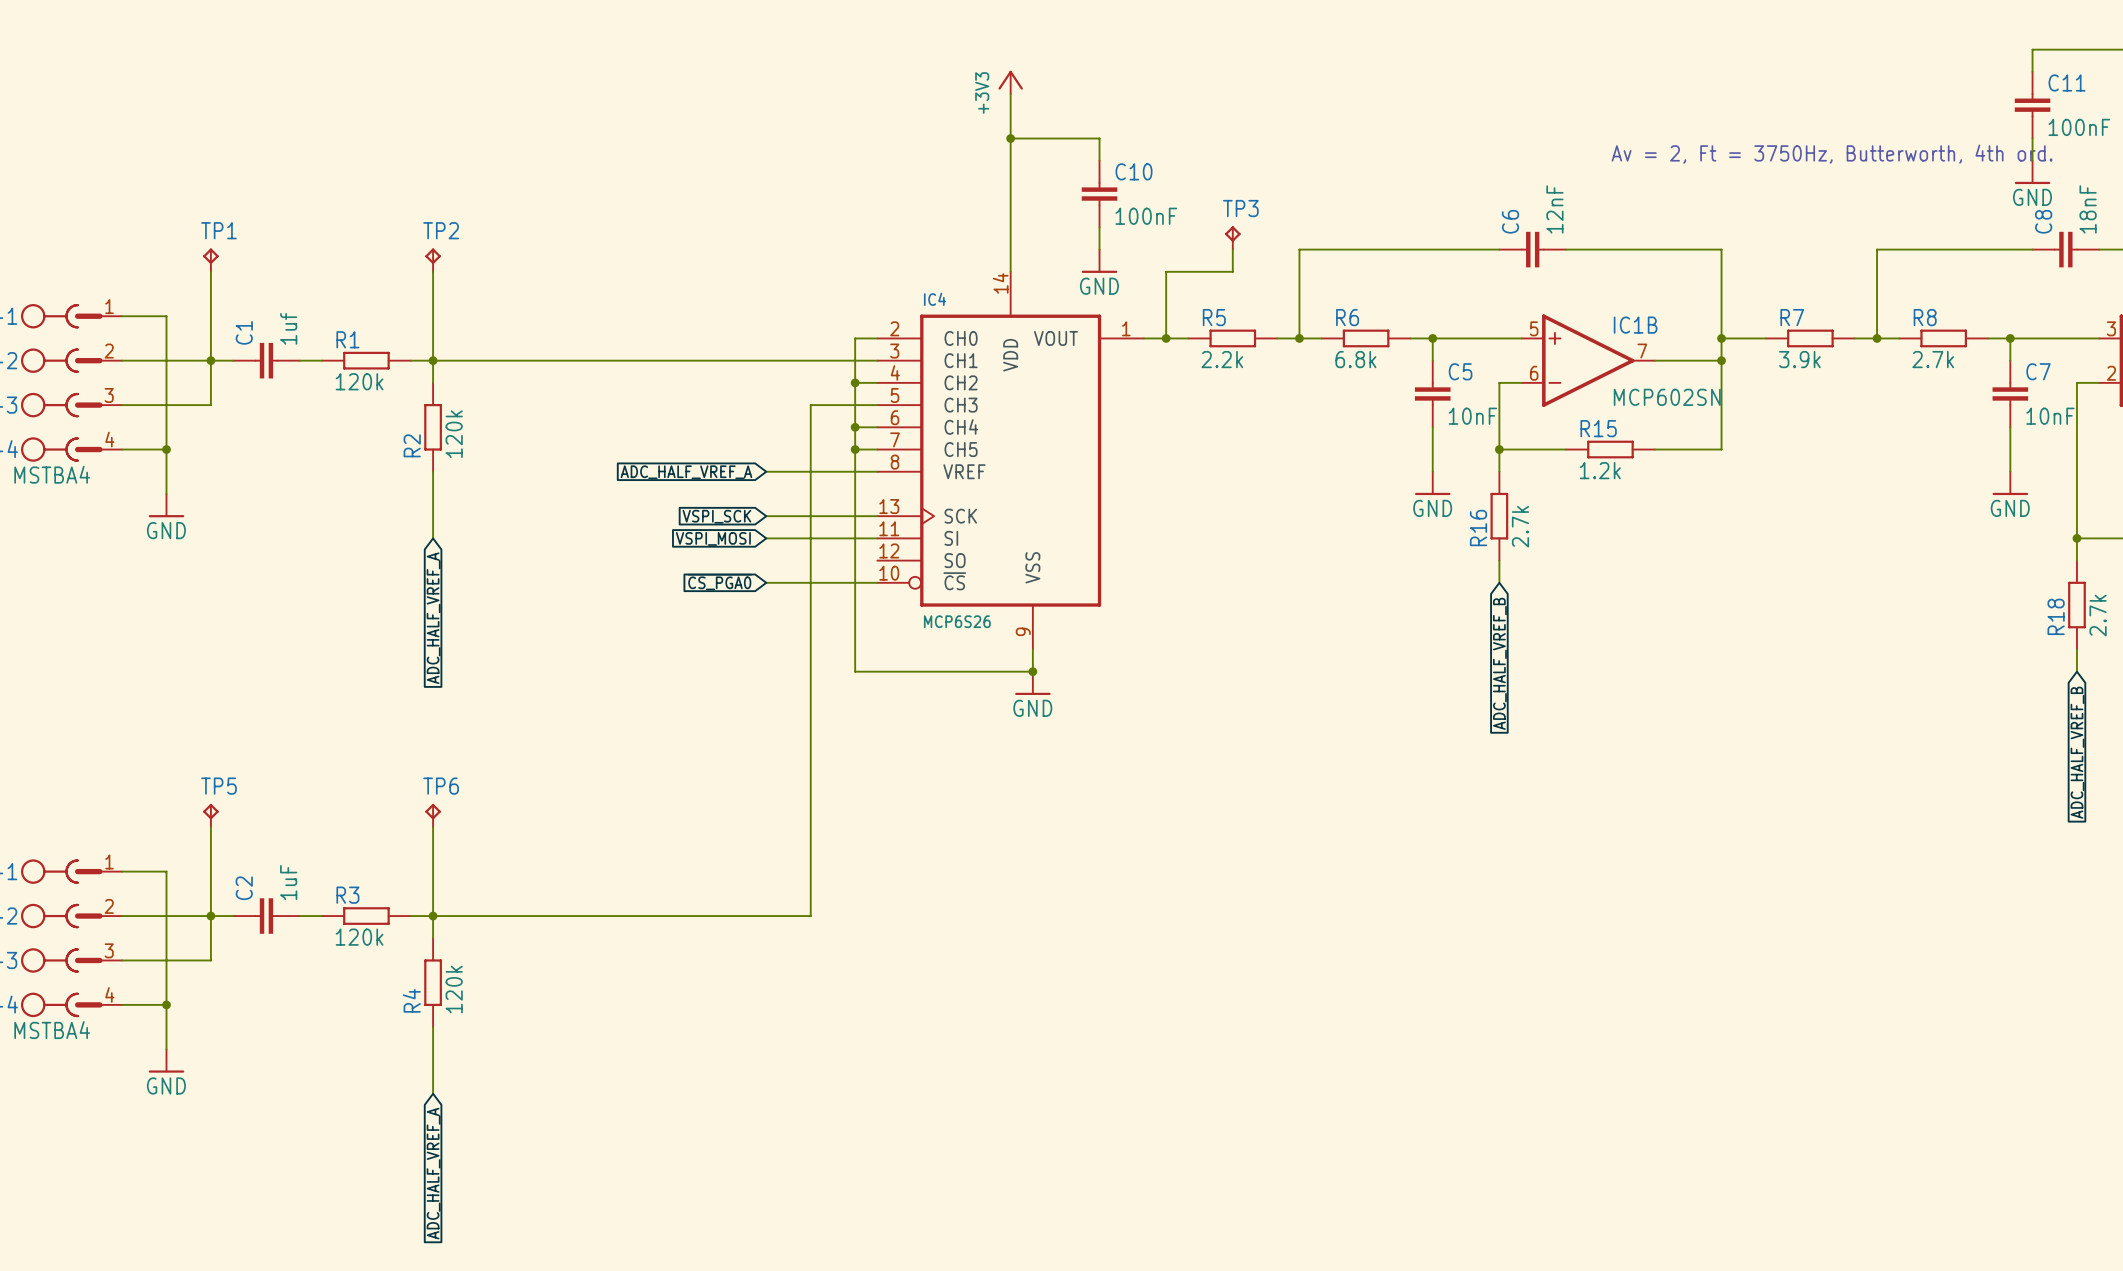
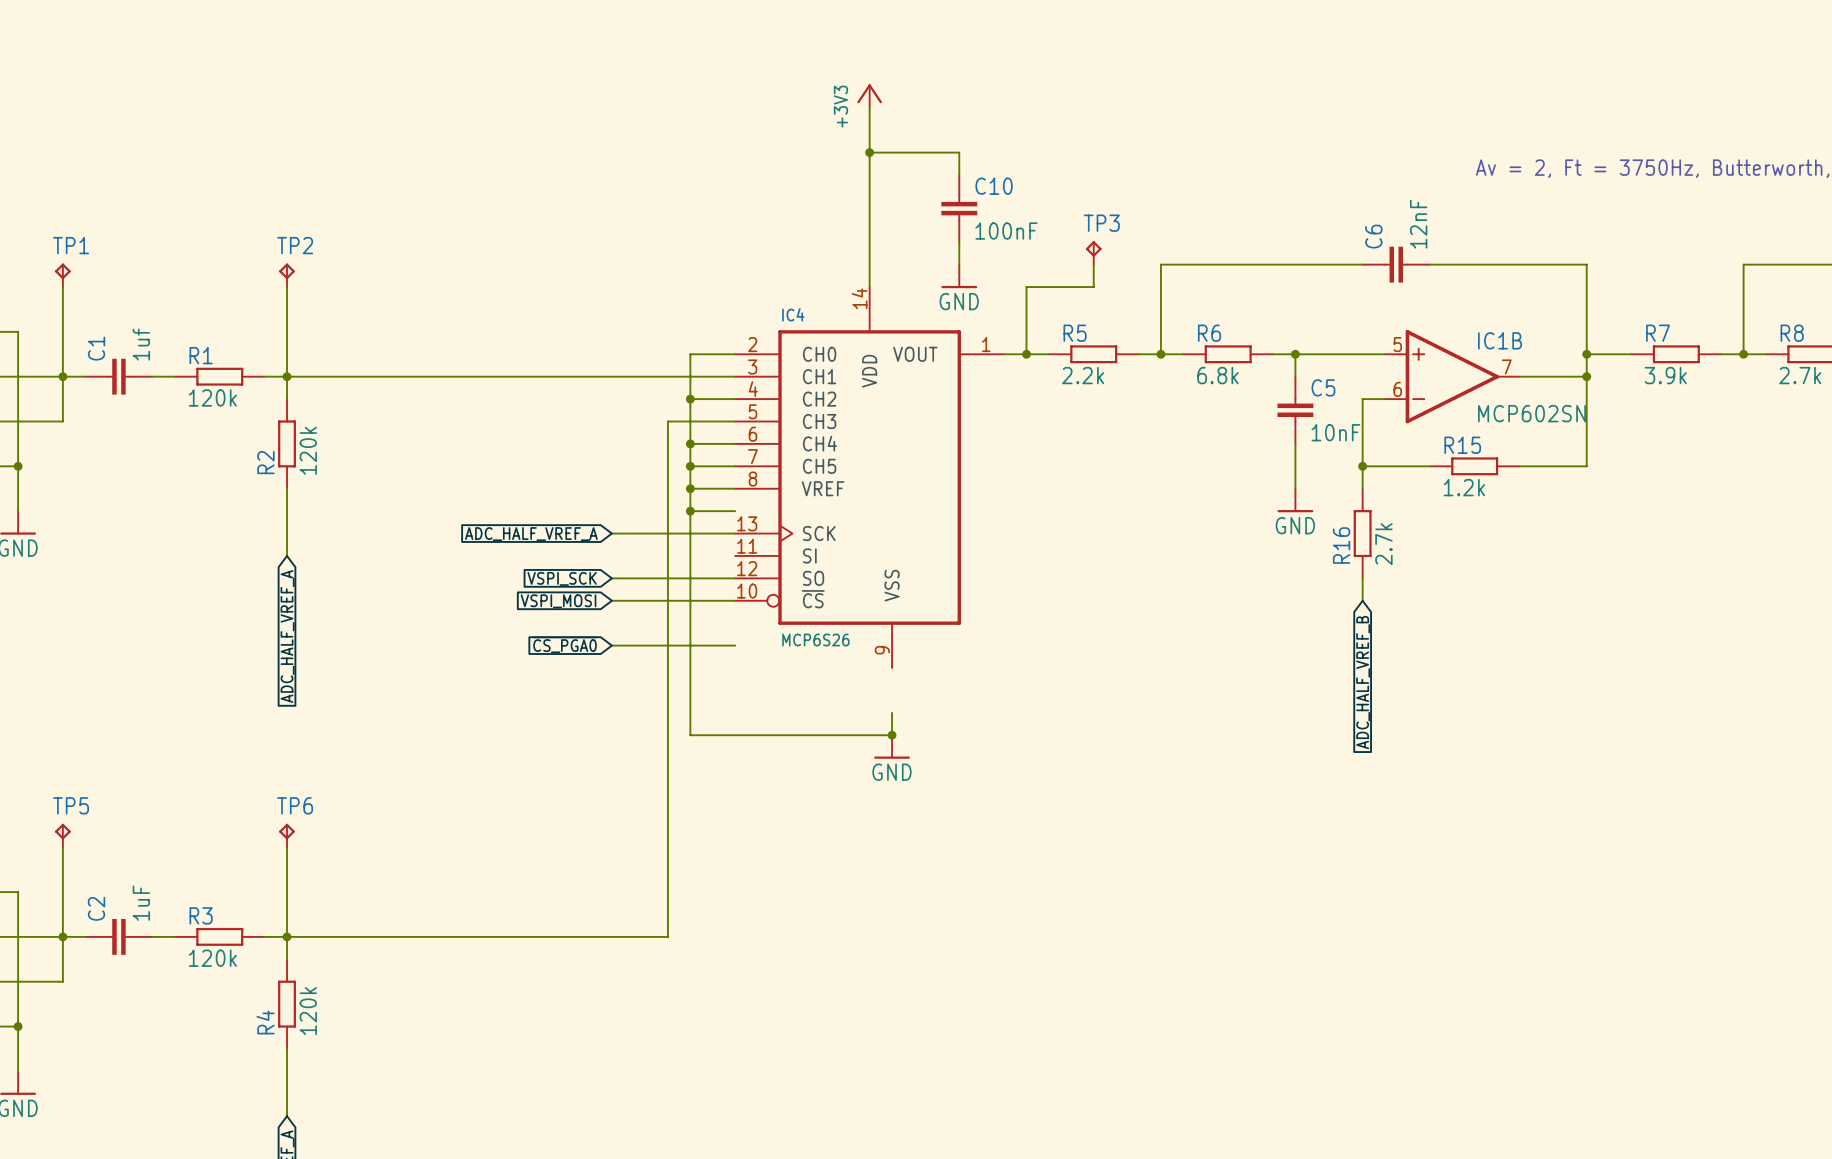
wire: (855, 338) (855, 671) (1032, 671) (1032, 649) -> (712, 354) (690, 354) (690, 735) (892, 735) (892, 712)
wire: none -> (690, 399) (712, 399)
junction position: (855, 382) -> (690, 399)
wire: none -> (690, 443) (712, 443)
junction: none -> (690, 443)
junction: (855, 427) -> none
wire: none -> (690, 466) (712, 466)
junction: none -> (690, 466)
junction: (855, 449) -> none
wire: (766, 471) (832, 471) -> none
junction: none -> (690, 488)
global label position: ADC_HALF_VREF_A (686, 472) -> ADC_HALF_VREF_A (531, 534)
wire: none -> (690, 511) (735, 511)
junction: none -> (690, 511)
global label position: VSPI_SCK (716, 516) -> VSPI_SCK (562, 578)
wire: none -> (611, 533) (623, 533)
global label position: VSPI_MOSI (713, 538) -> VSPI_MOSI (558, 601)
wire: (766, 538) (877, 538) -> none
wire: none -> (611, 578) (735, 578)
global label position: ~{CS_PGA0} (719, 582) -> ~{CS_PGA0} (565, 644)
wire: none -> (611, 600) (623, 600)
wire: none -> (611, 645) (735, 645)
junction position: (1032, 671) -> (892, 735)
power symbol position: GND (1032, 683) -> GND (892, 746)

